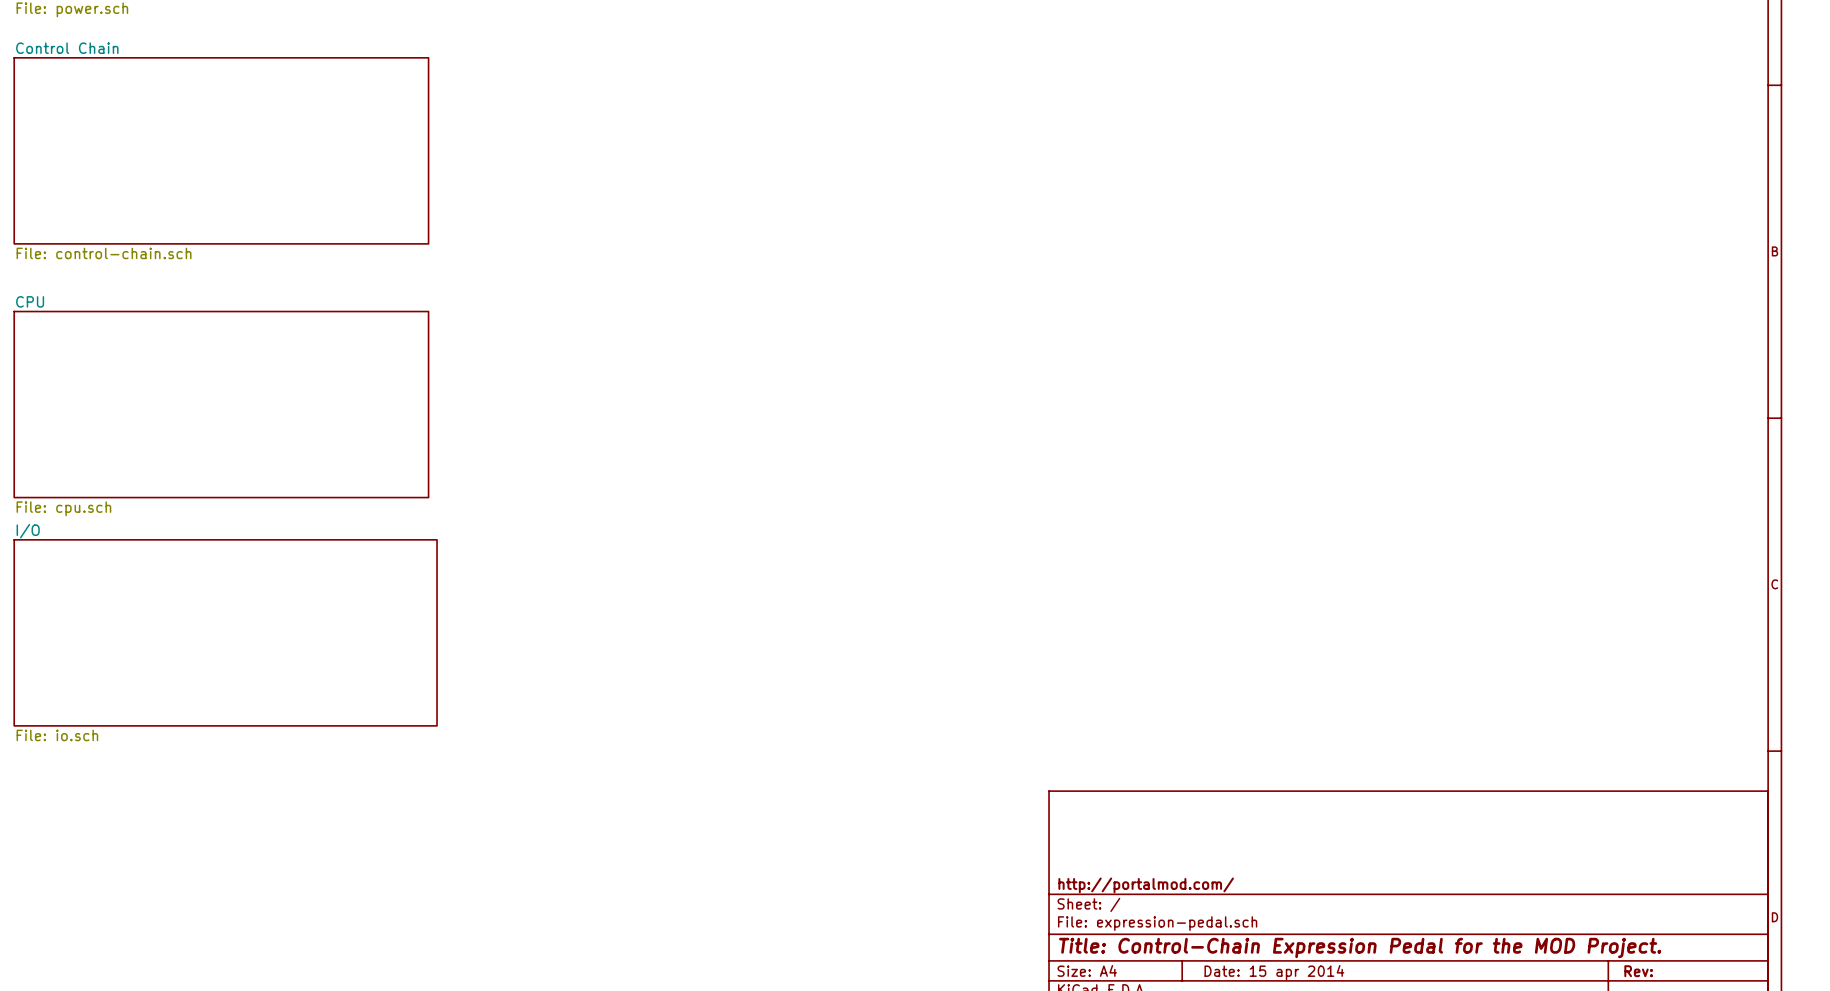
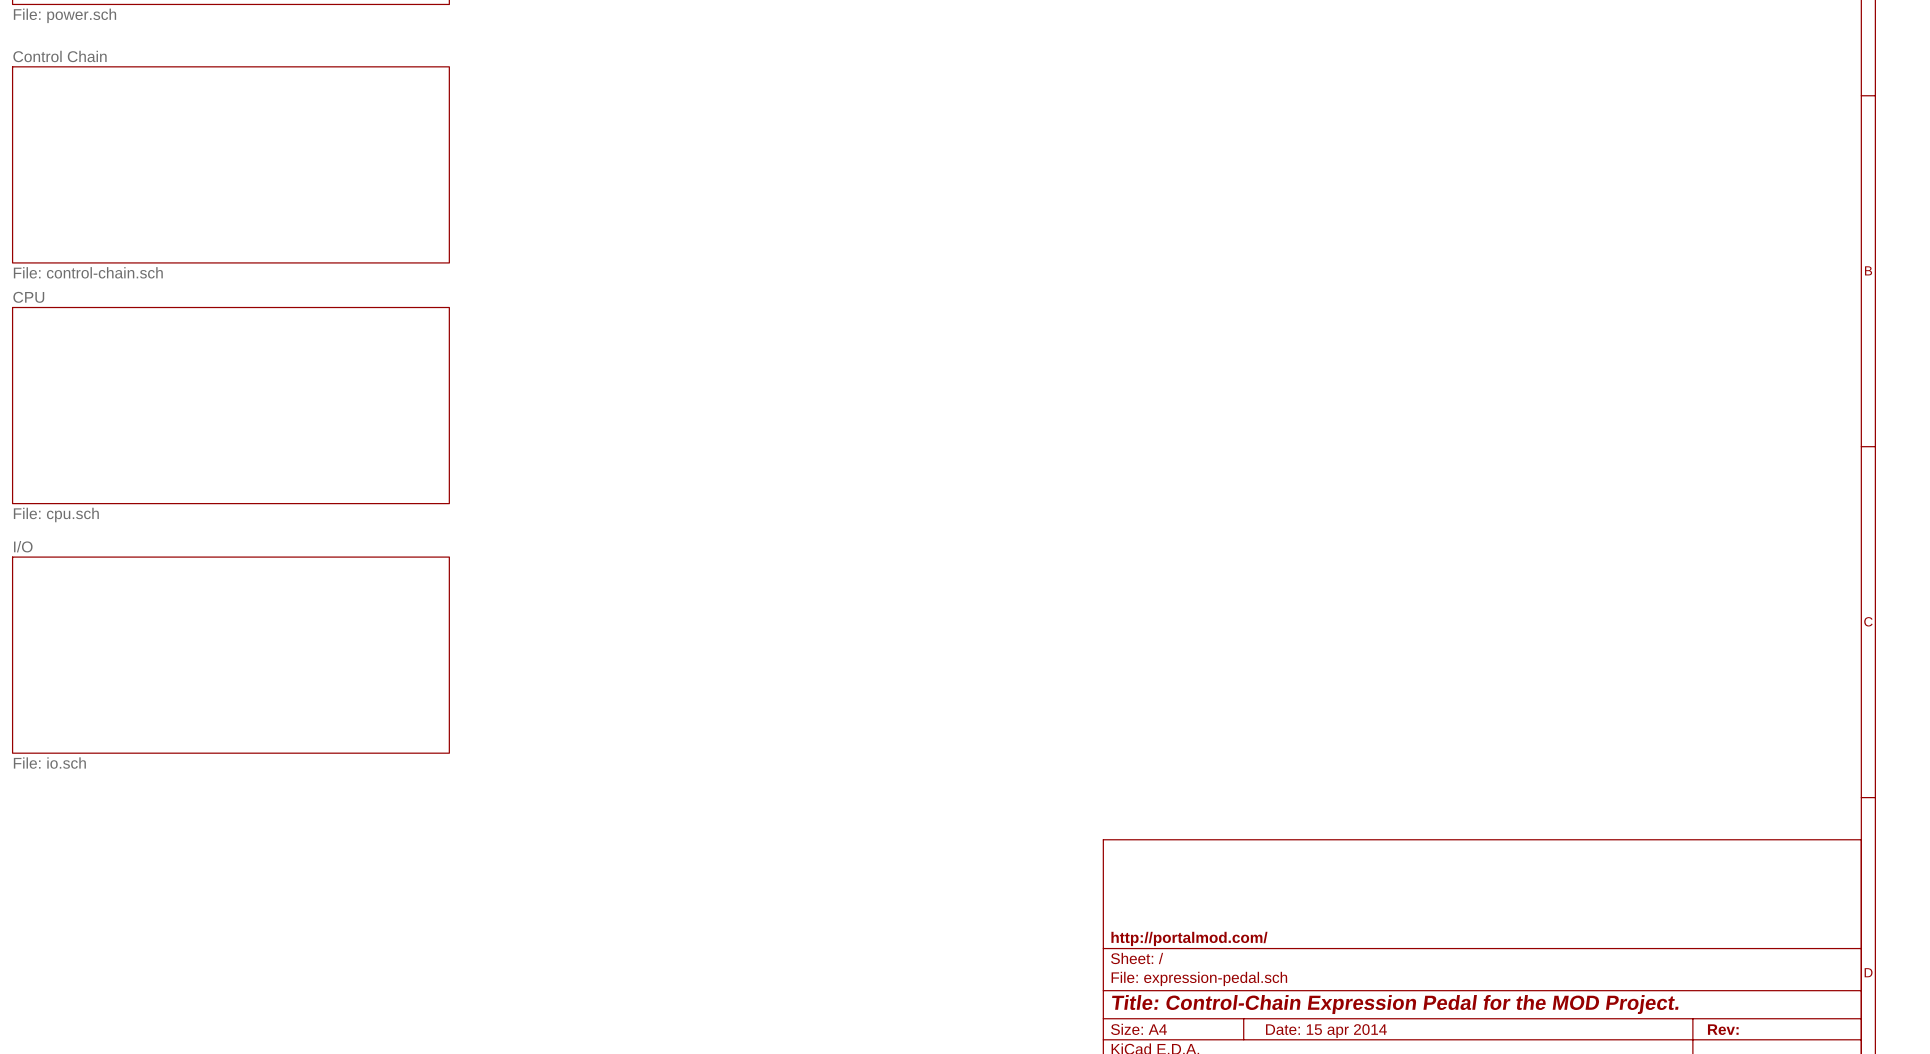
sheet CPU position: (221, 404) -> (230, 405)
sheet I/O: none -> File: io.sch (230, 655)
sheet I/O: File: io.sch (225, 632) -> none

